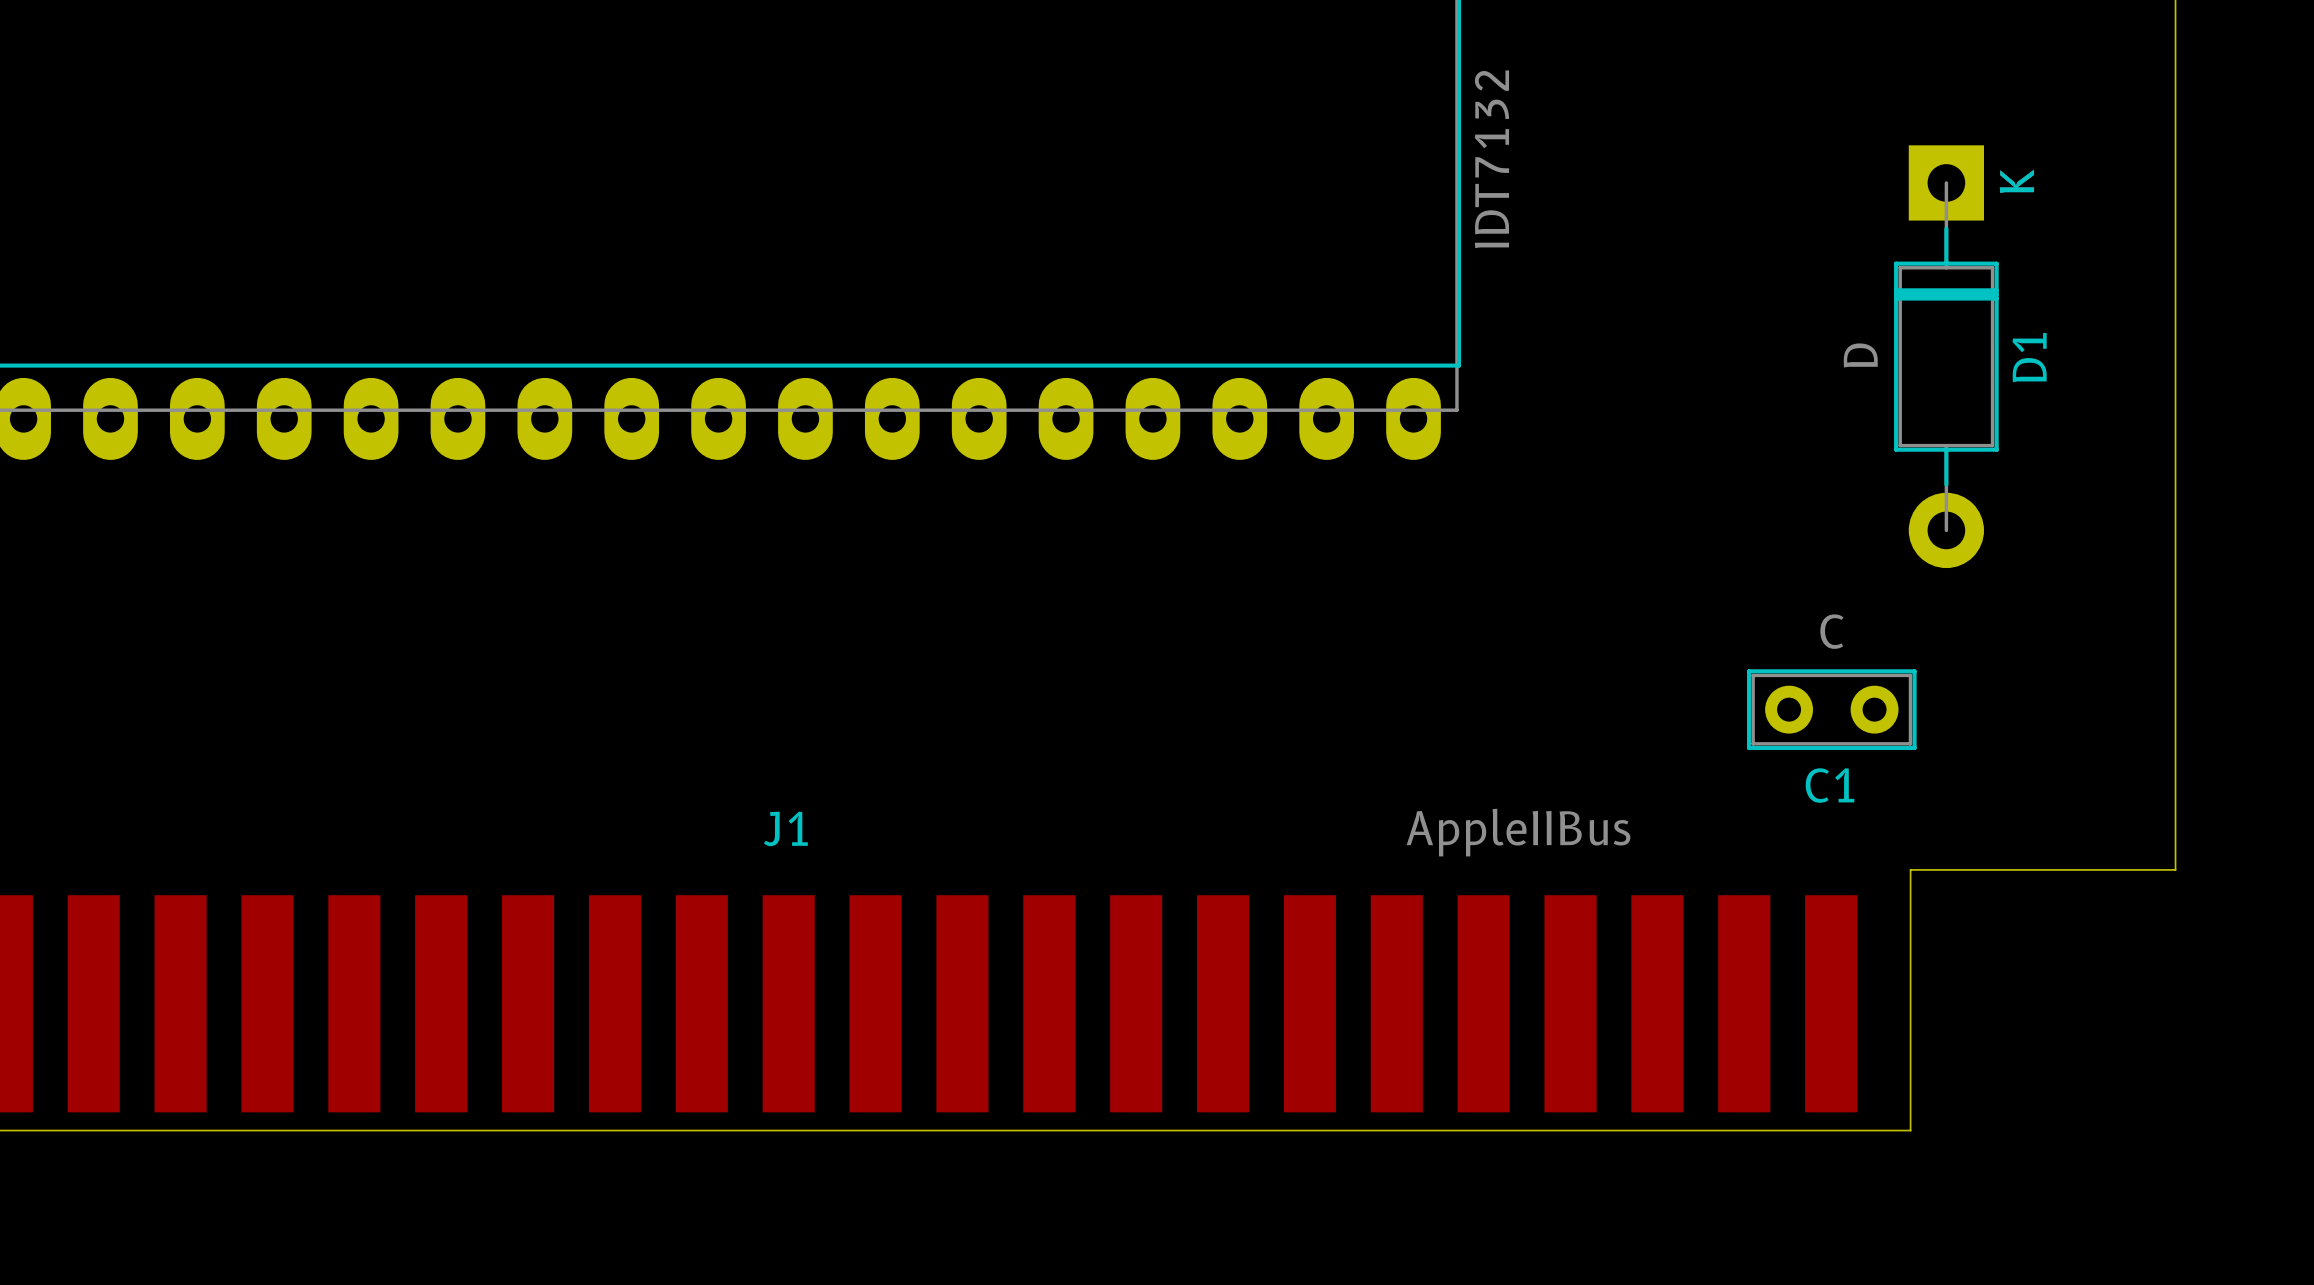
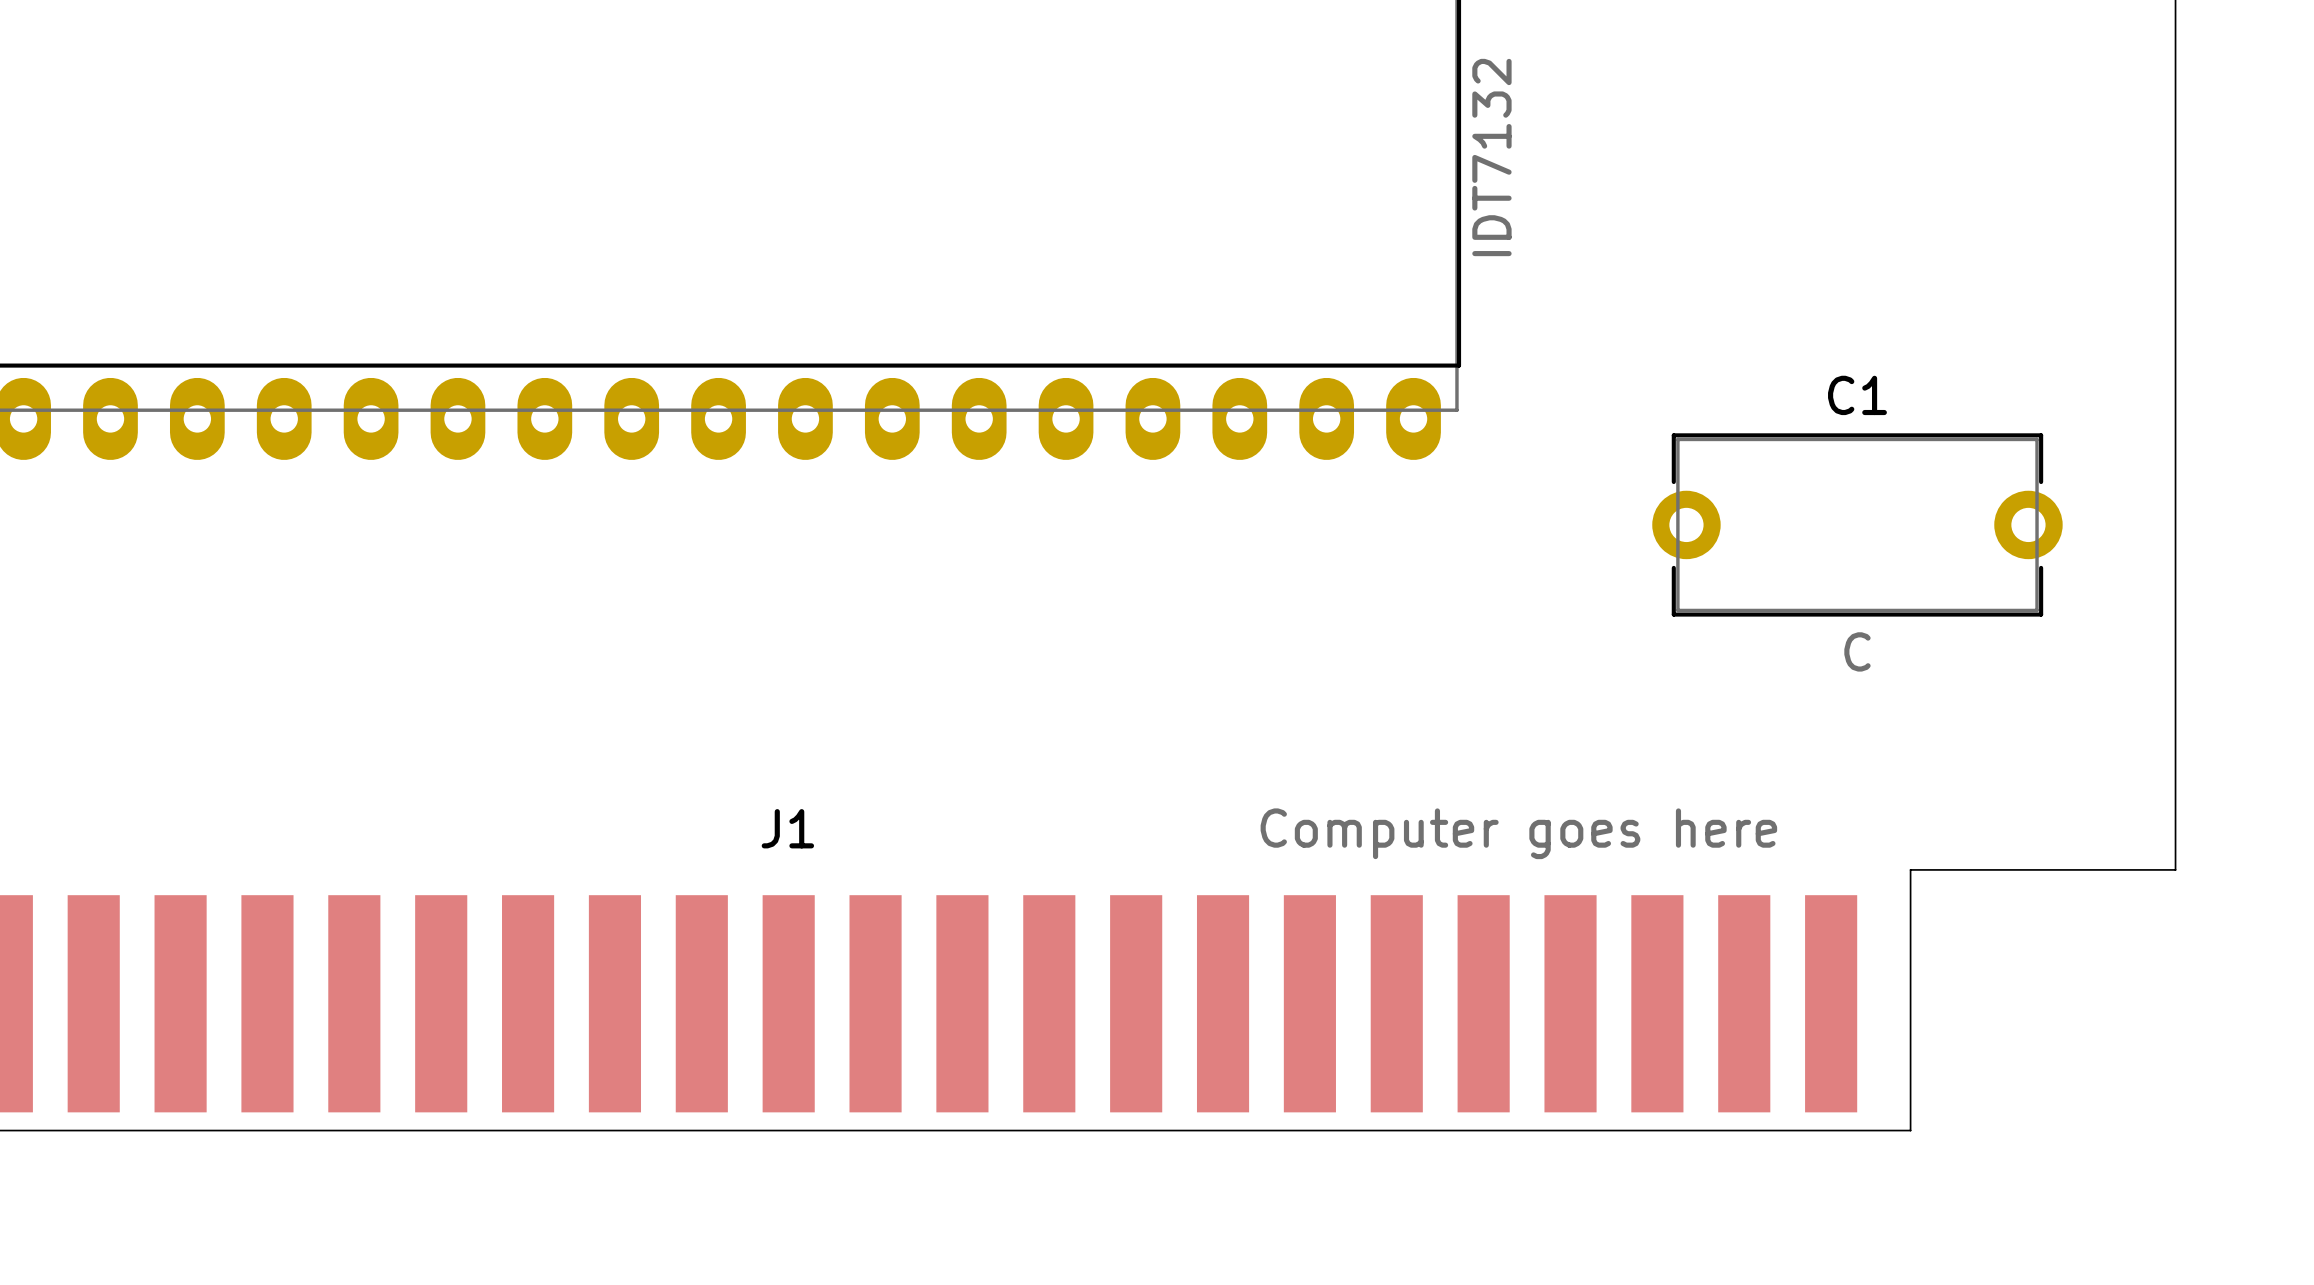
D1: D (1946, 356) -> none
C1 value position: C (1831, 631) -> C (1857, 651)
C1 footprint: [1746, 669, 1917, 750] -> [1652, 433, 2063, 617]
C1 name position: C1 (1830, 785) -> C1 (1857, 395)
J1 value: AppleIIBus (1518, 832) -> Computer goes here (1518, 833)

